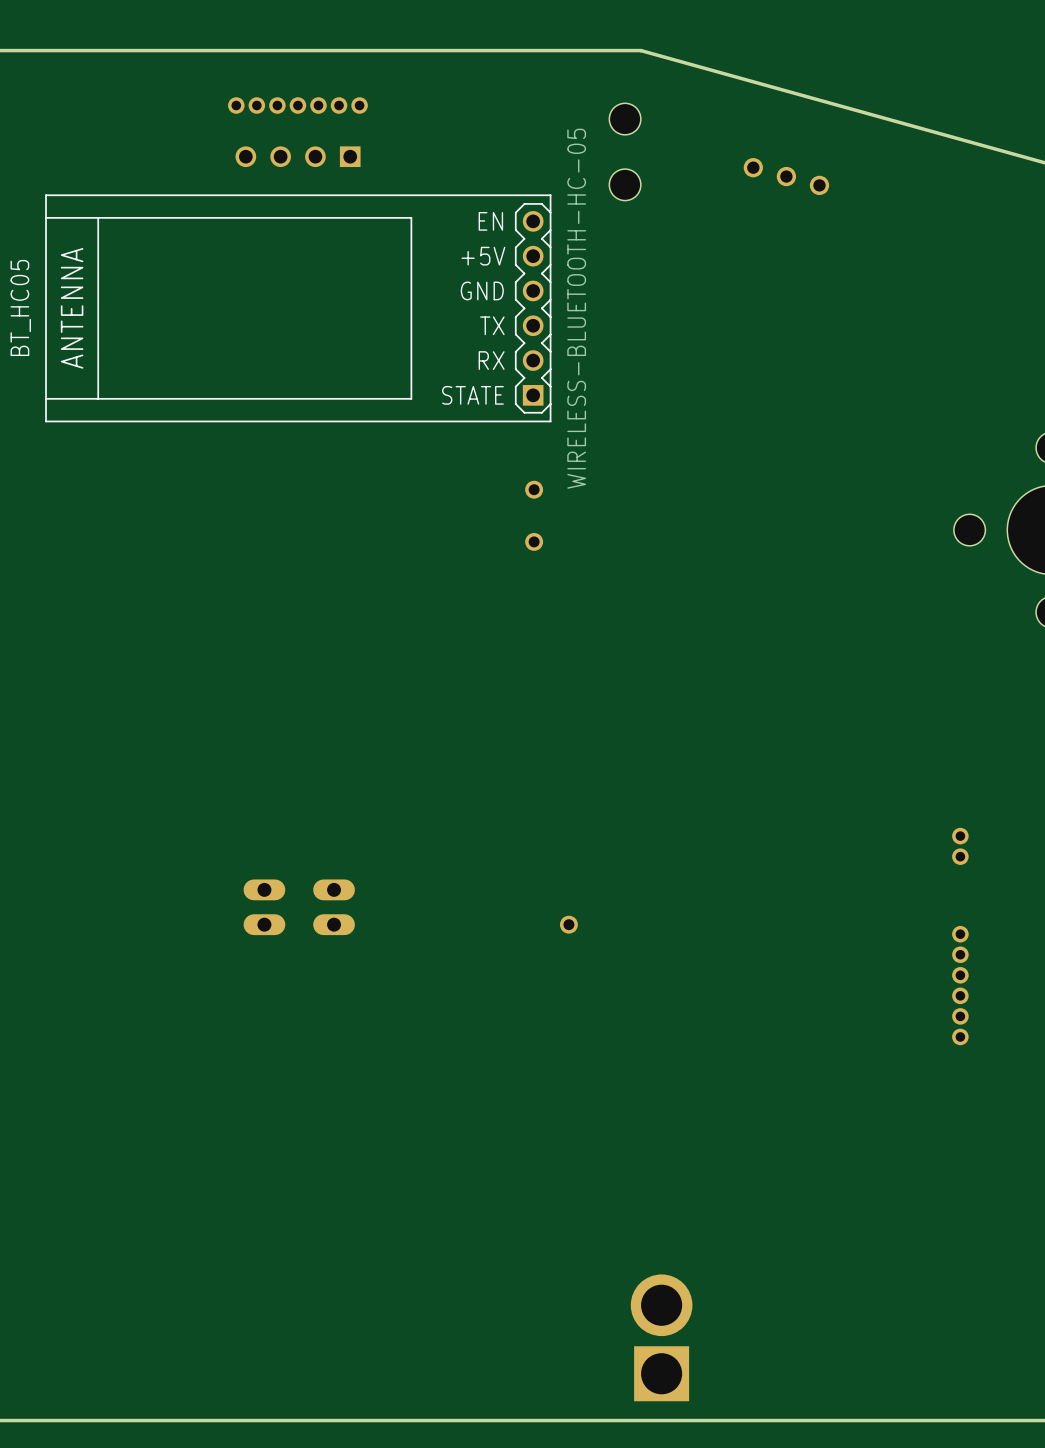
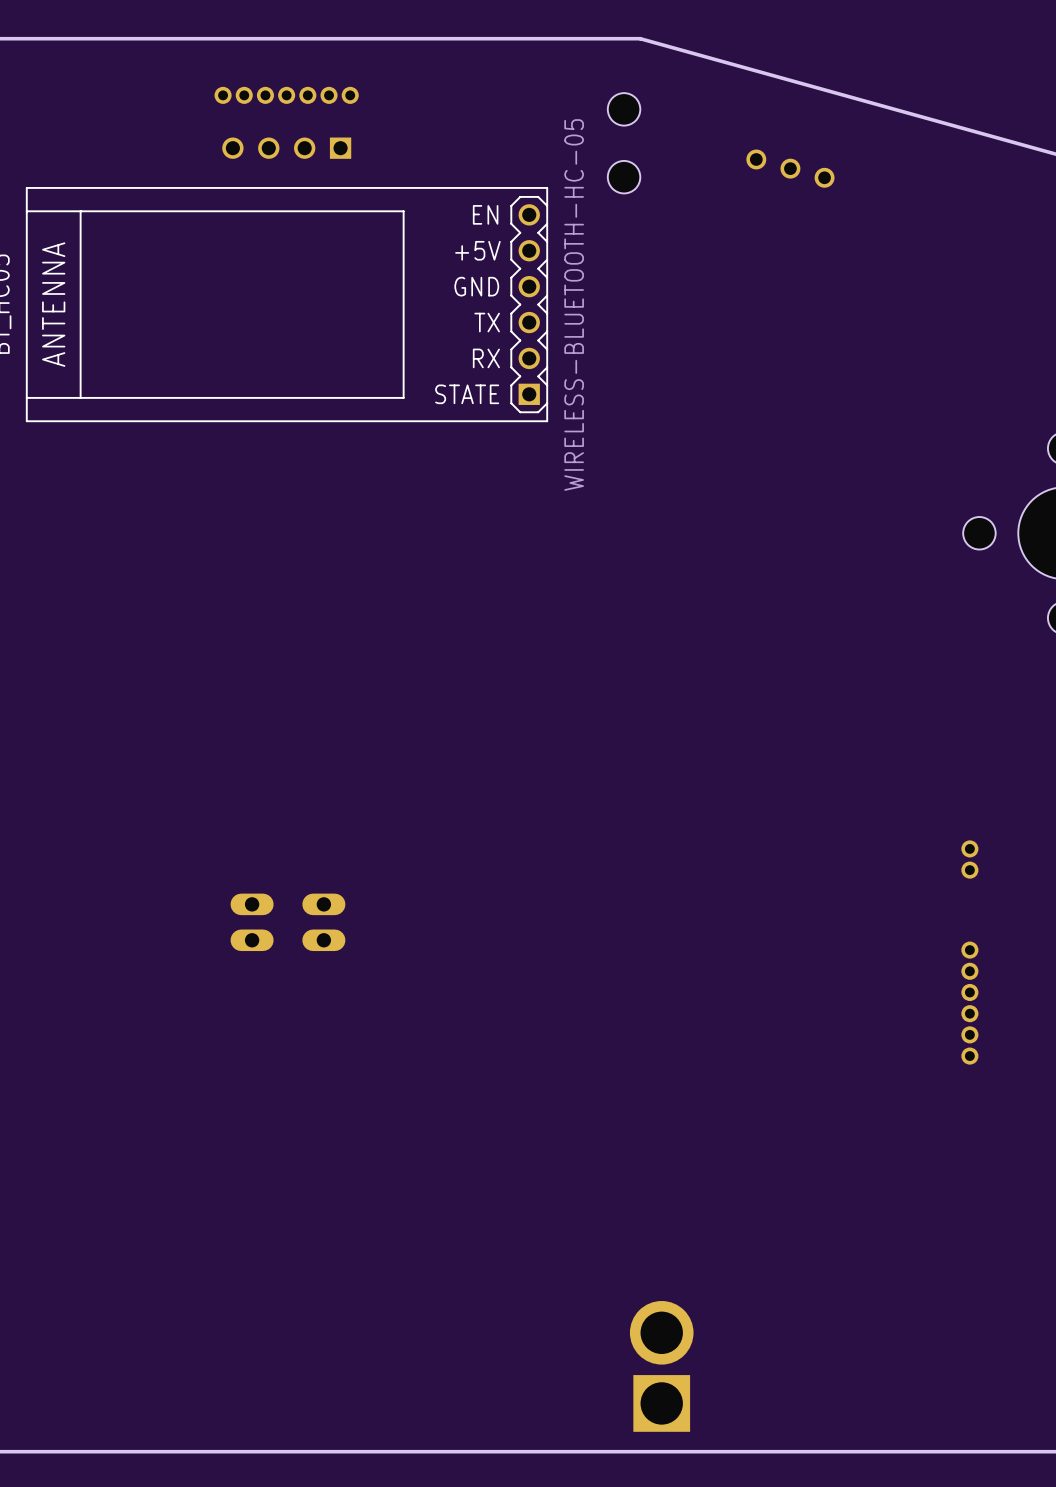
part: (534, 489) -> none
part: (534, 541) -> none
part: (568, 924) -> none

